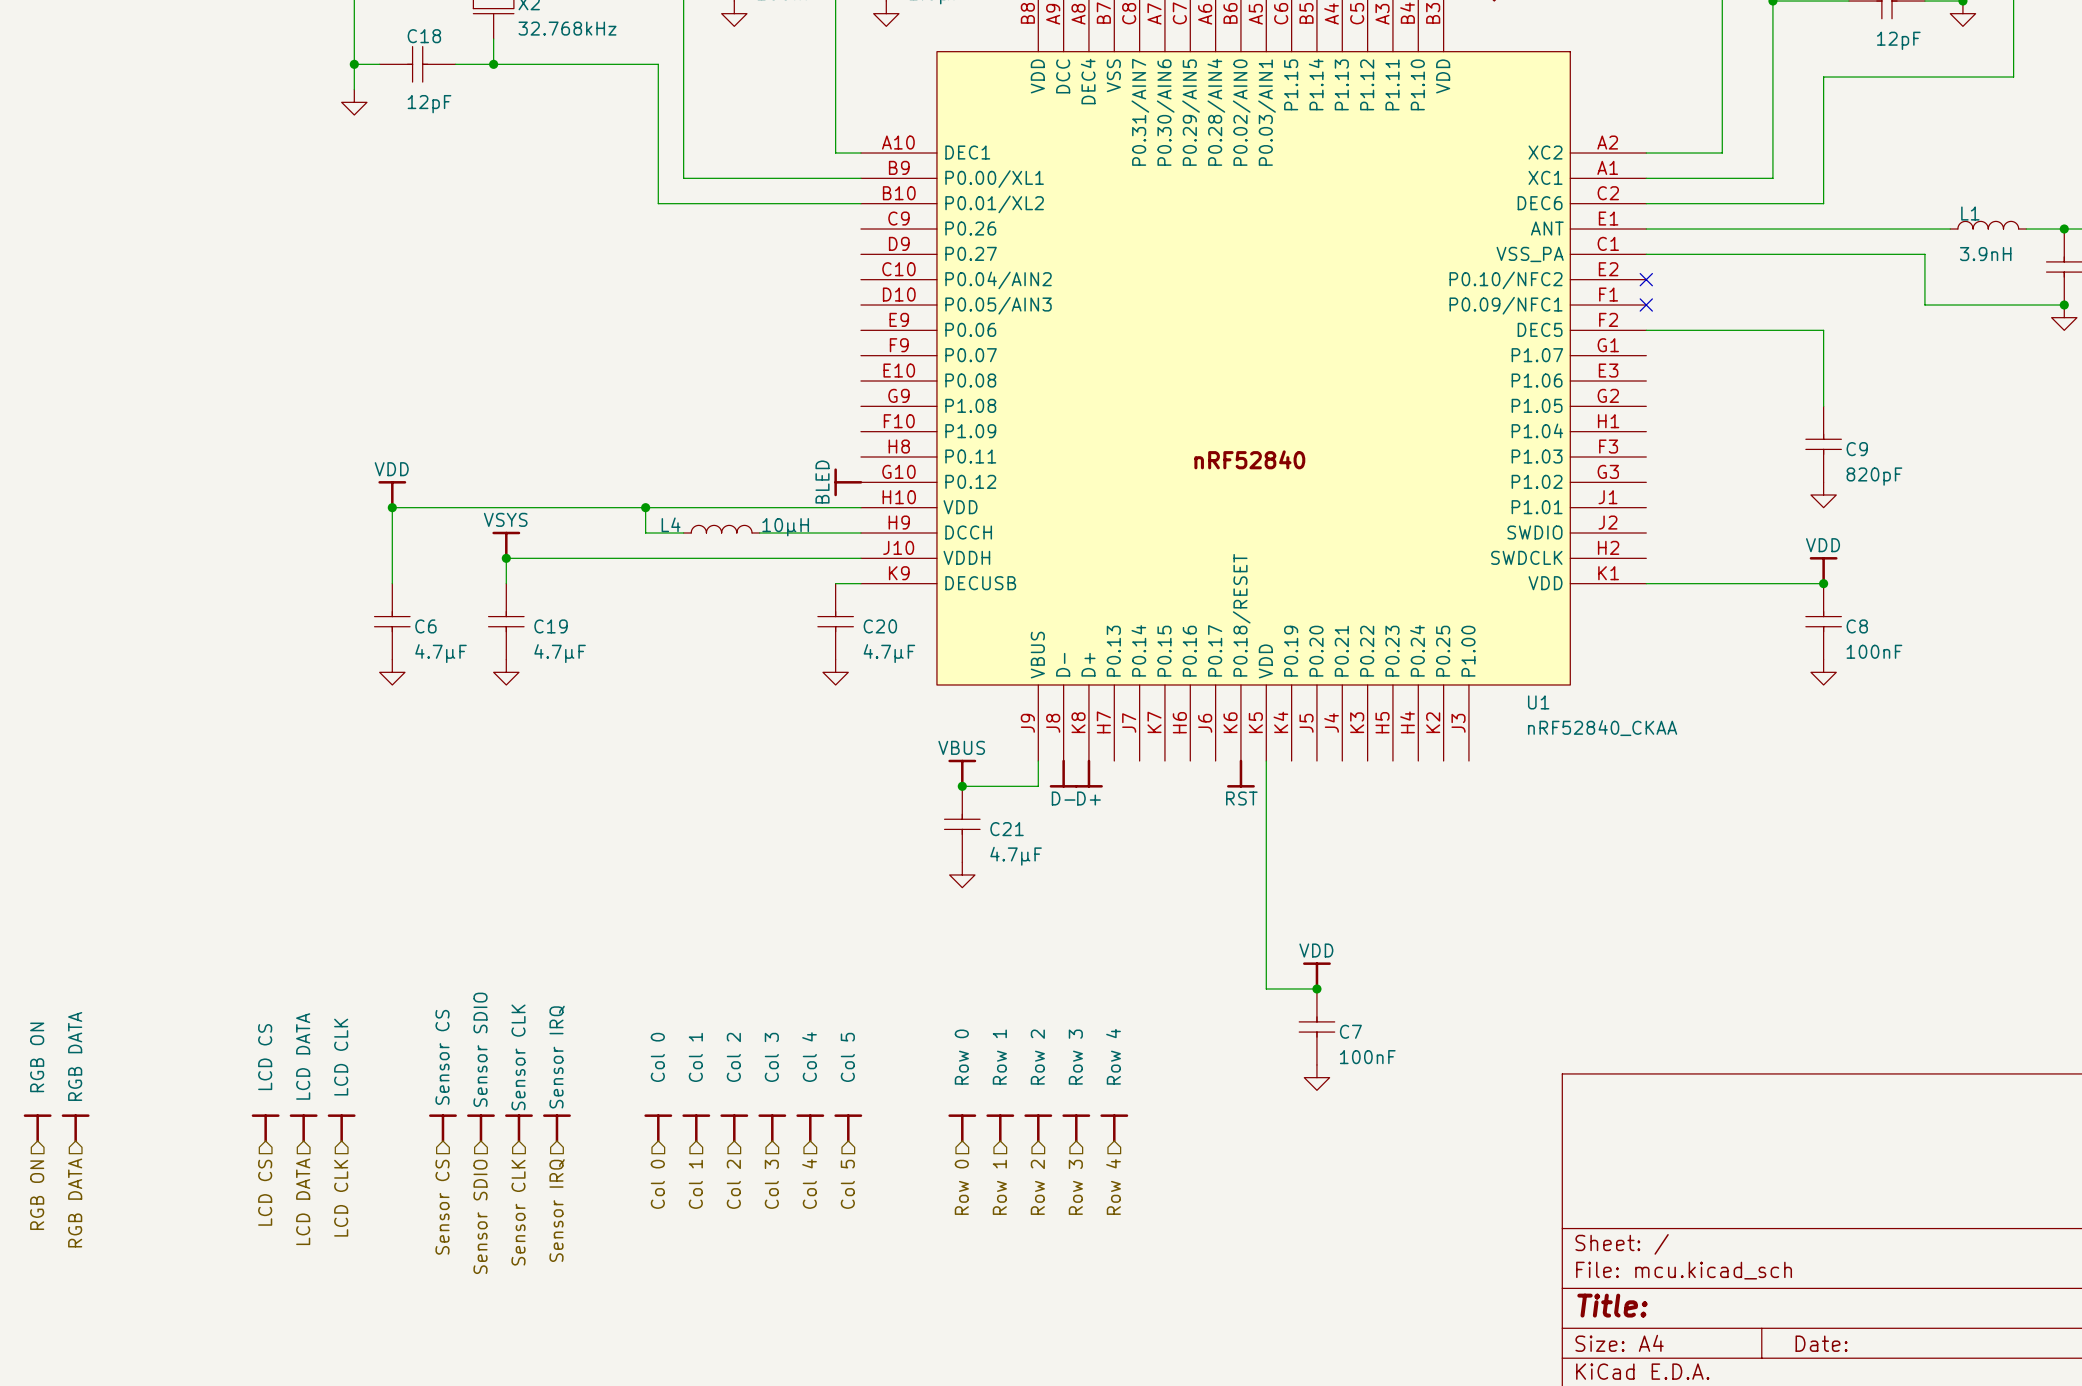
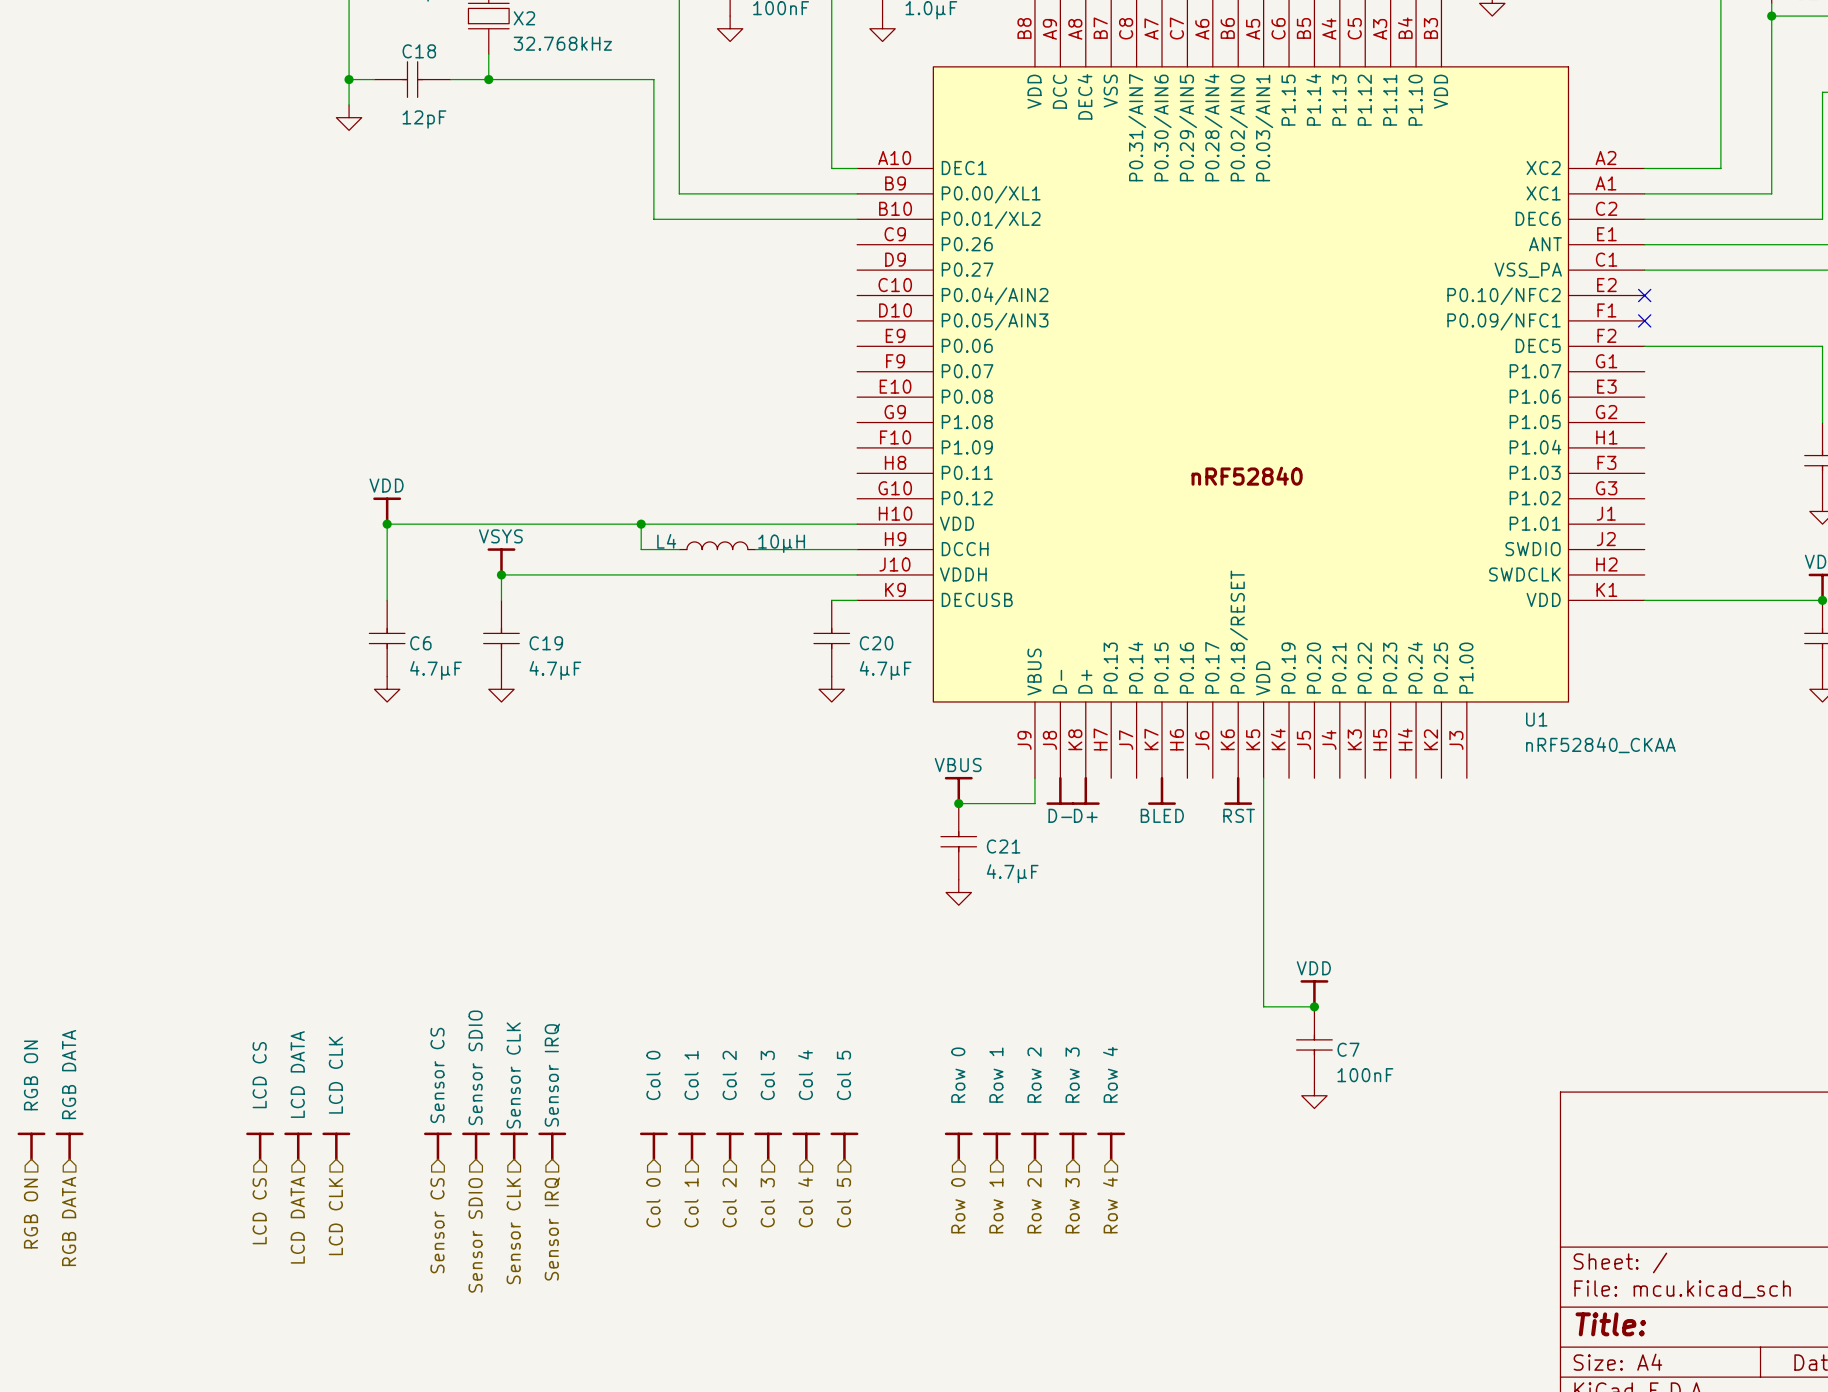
power symbol: BLED (848, 482) -> none
power symbol: none -> BLED (1162, 790)

